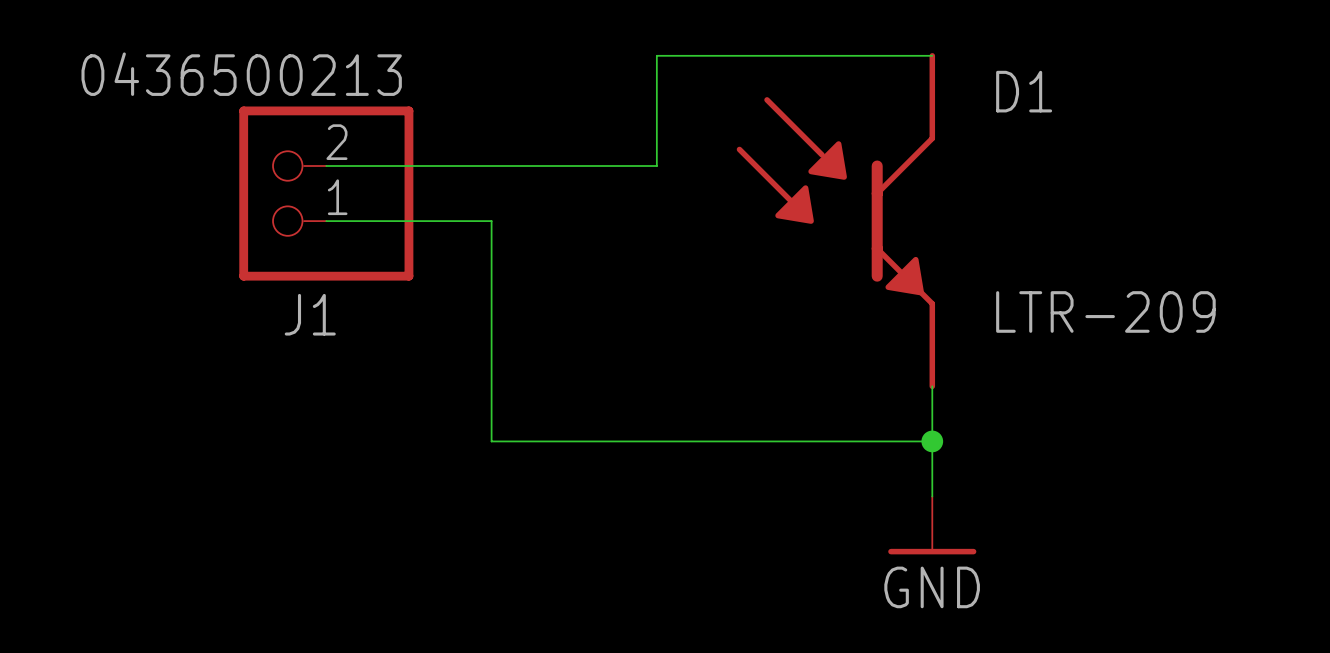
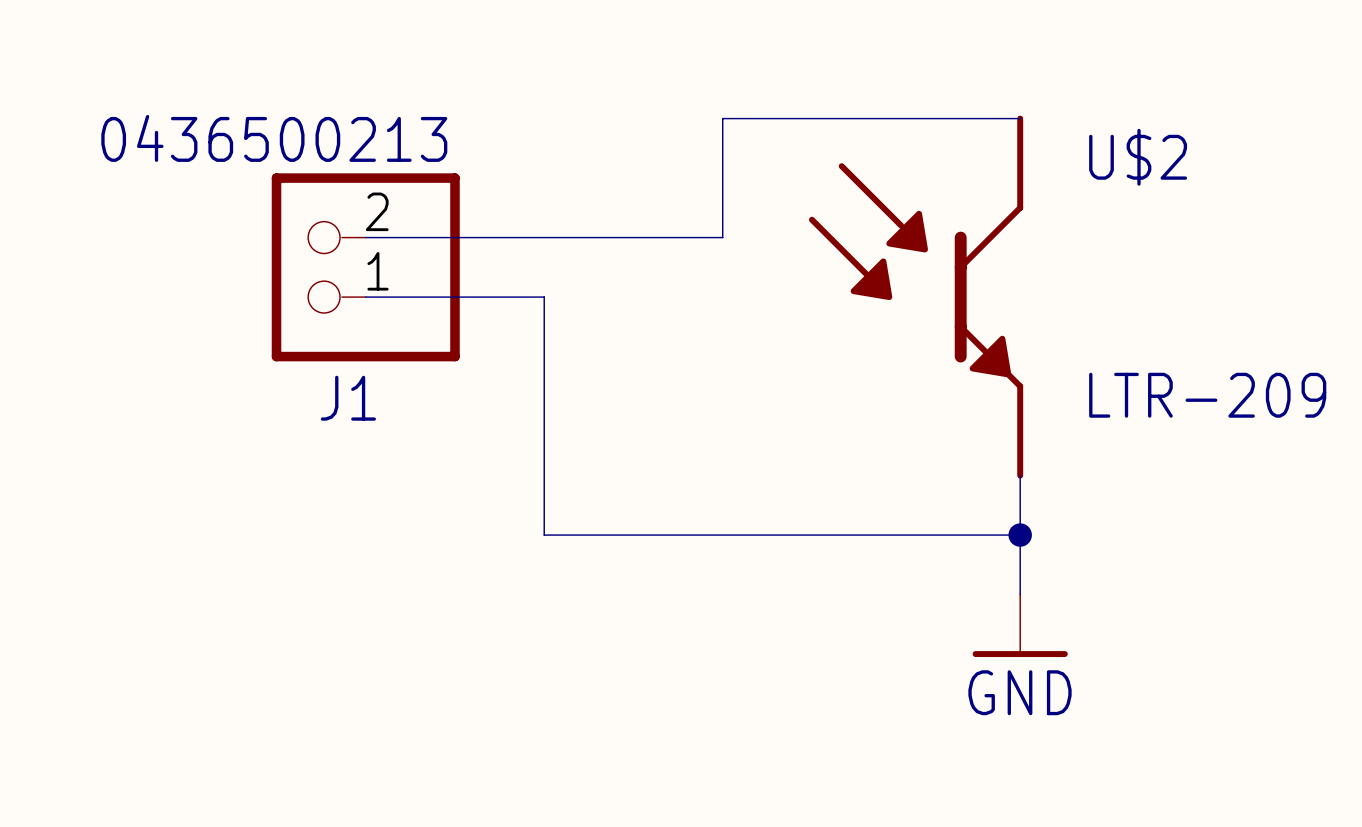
D1 name: D1 (1024, 91) -> U$2 (1138, 157)

